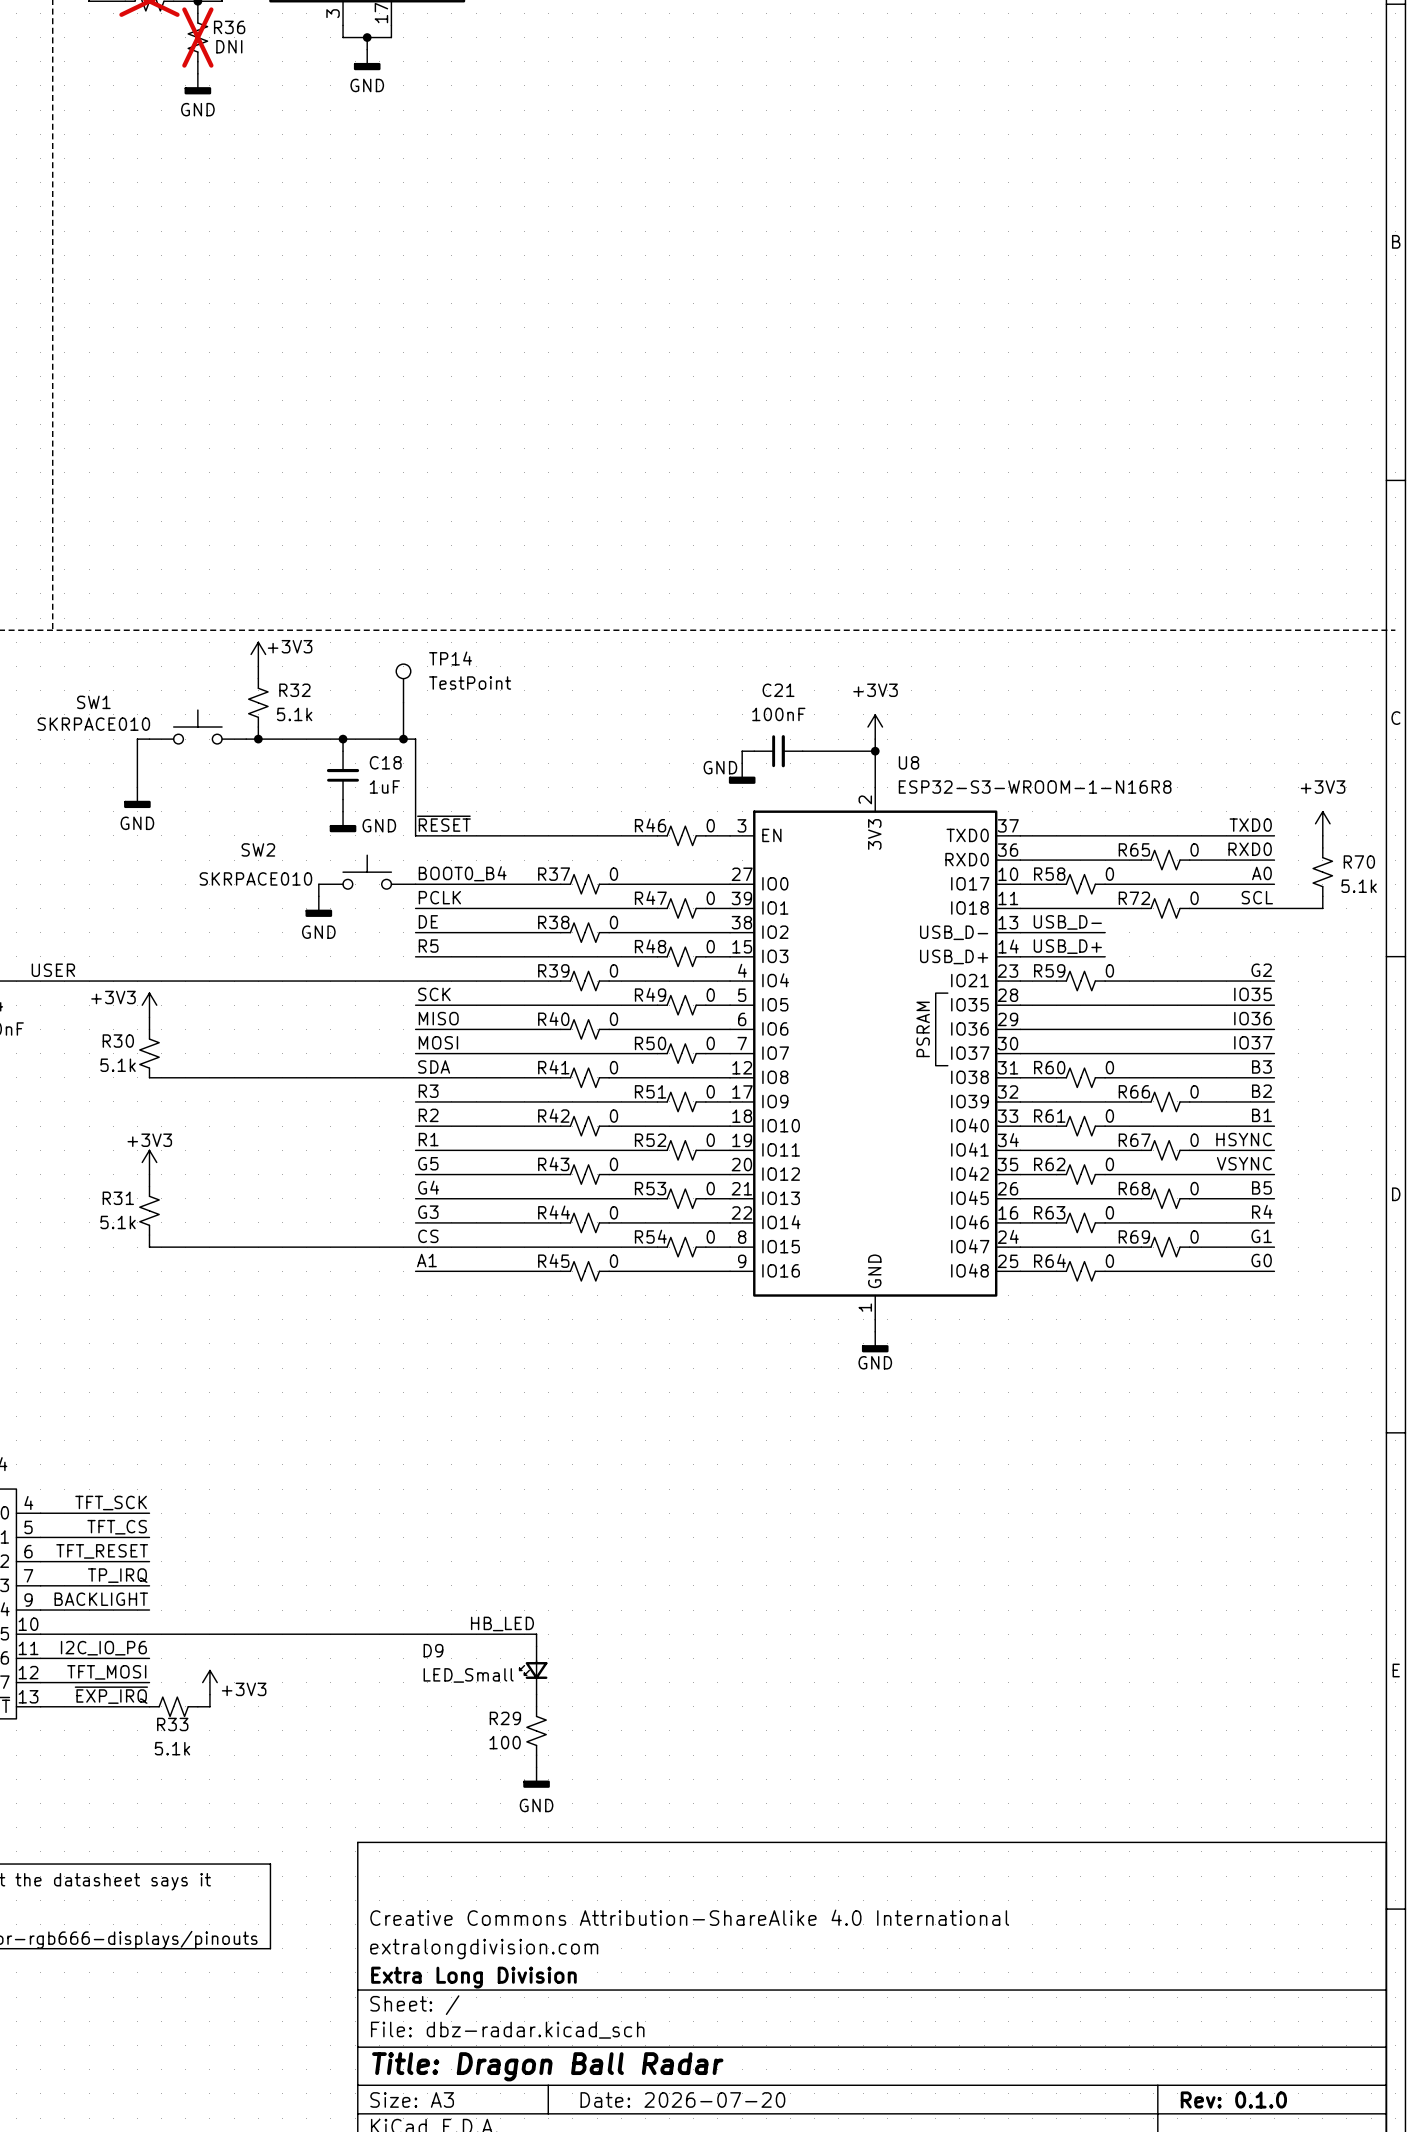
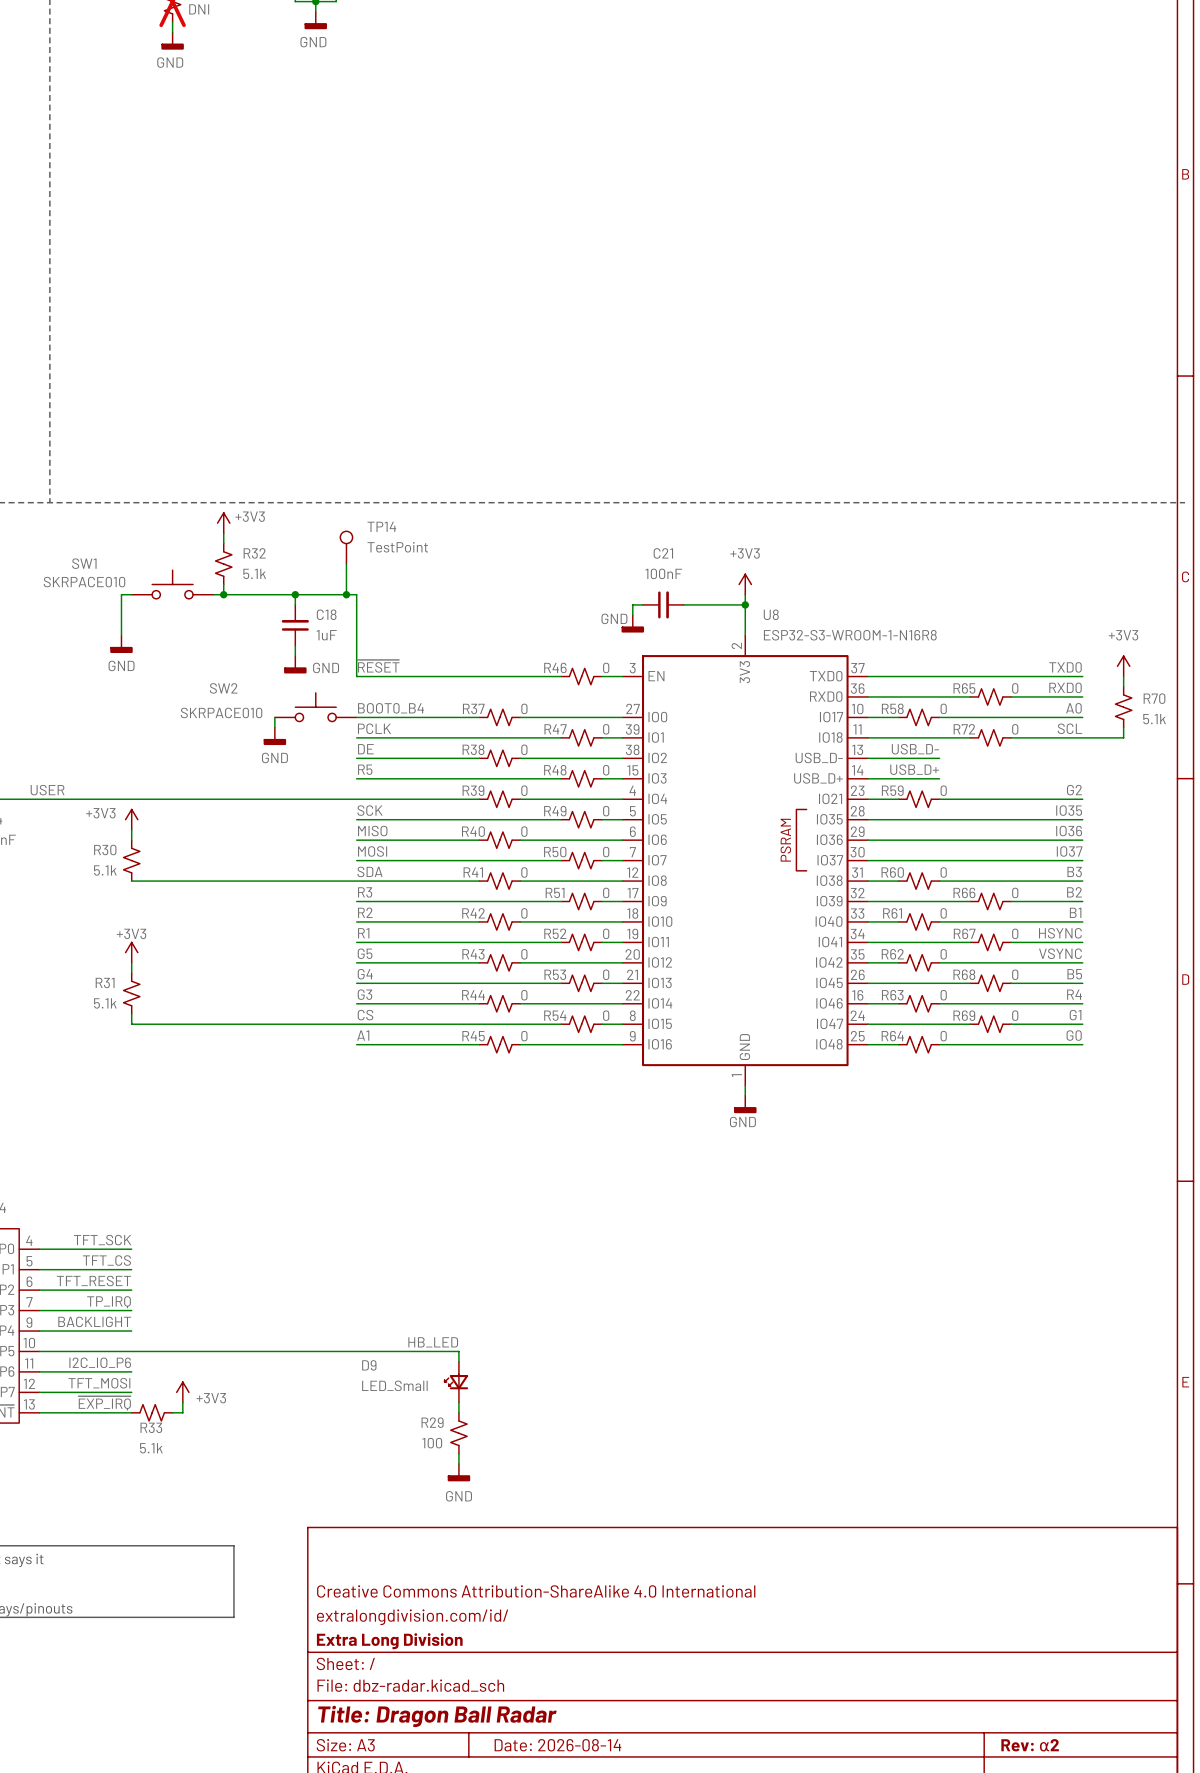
title block: extralongdivision.com (484, 1949) -> extralongdivision.com/id/ (412, 1617)
title block: Date: 2026-07-20 (682, 2099) -> Date: 2026-08-14 (557, 1745)
title block: Rev: 0.1.0 (1233, 2099) -> Rev: α2 (1030, 1745)

